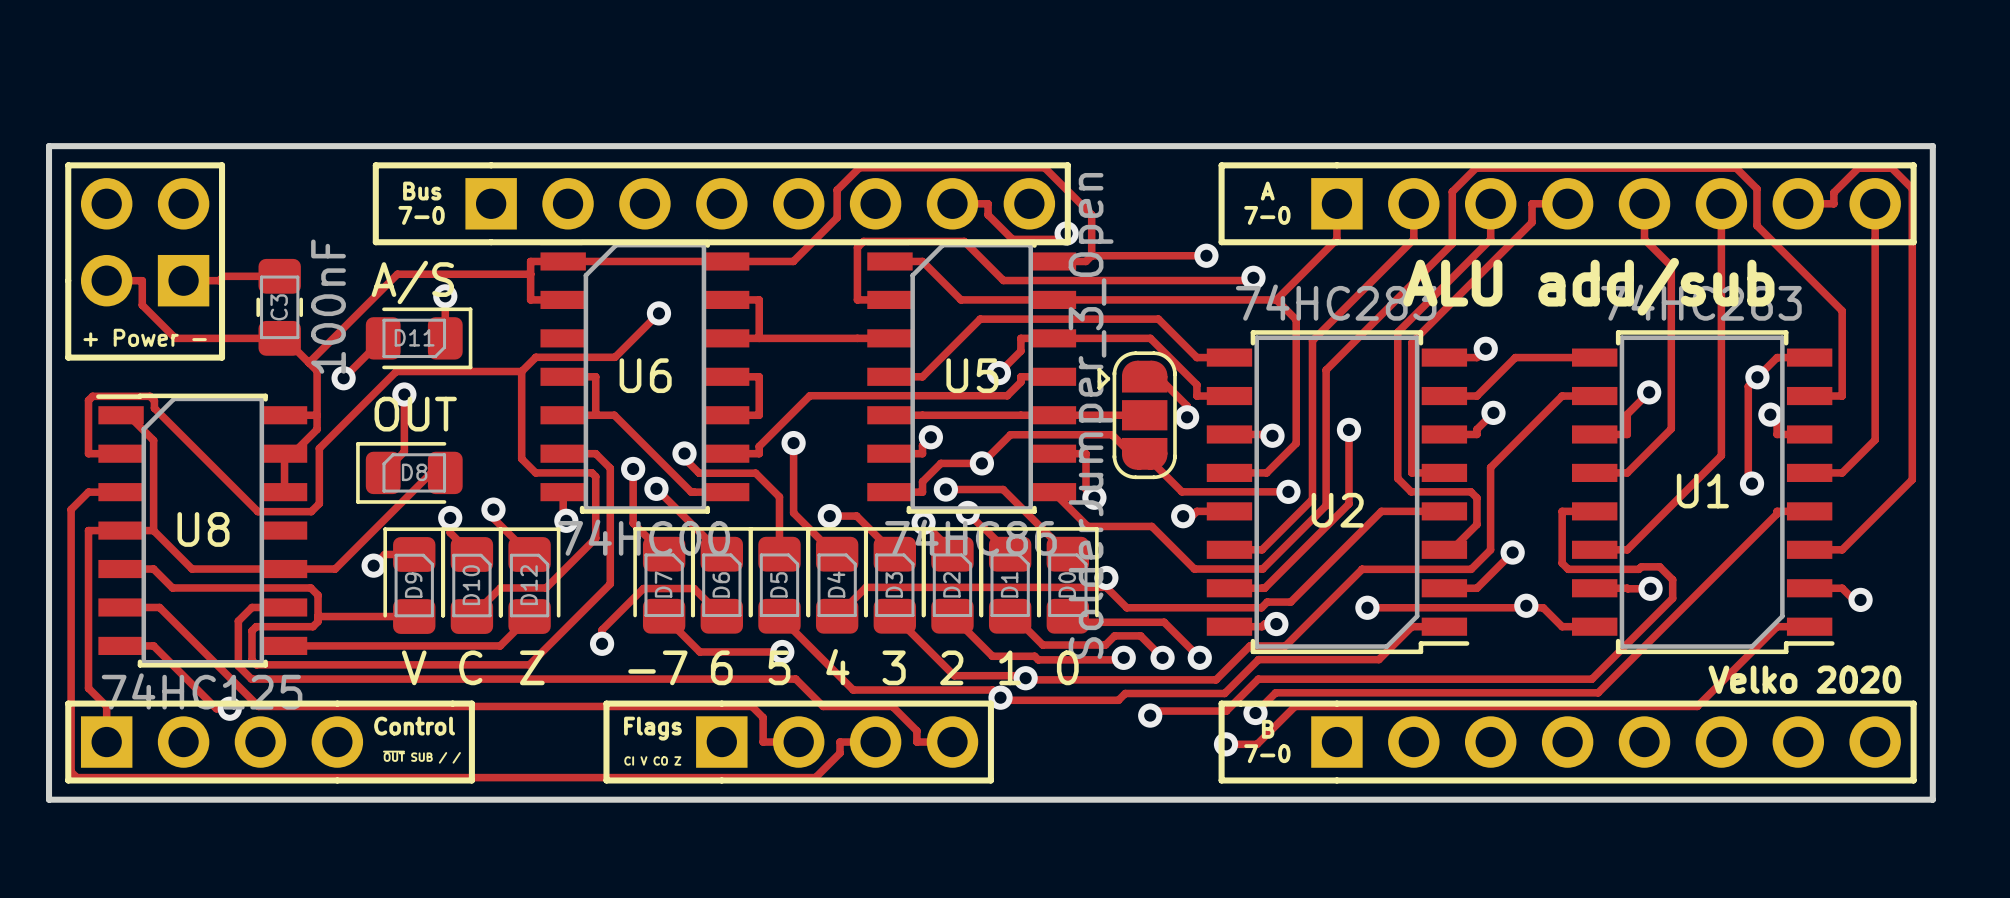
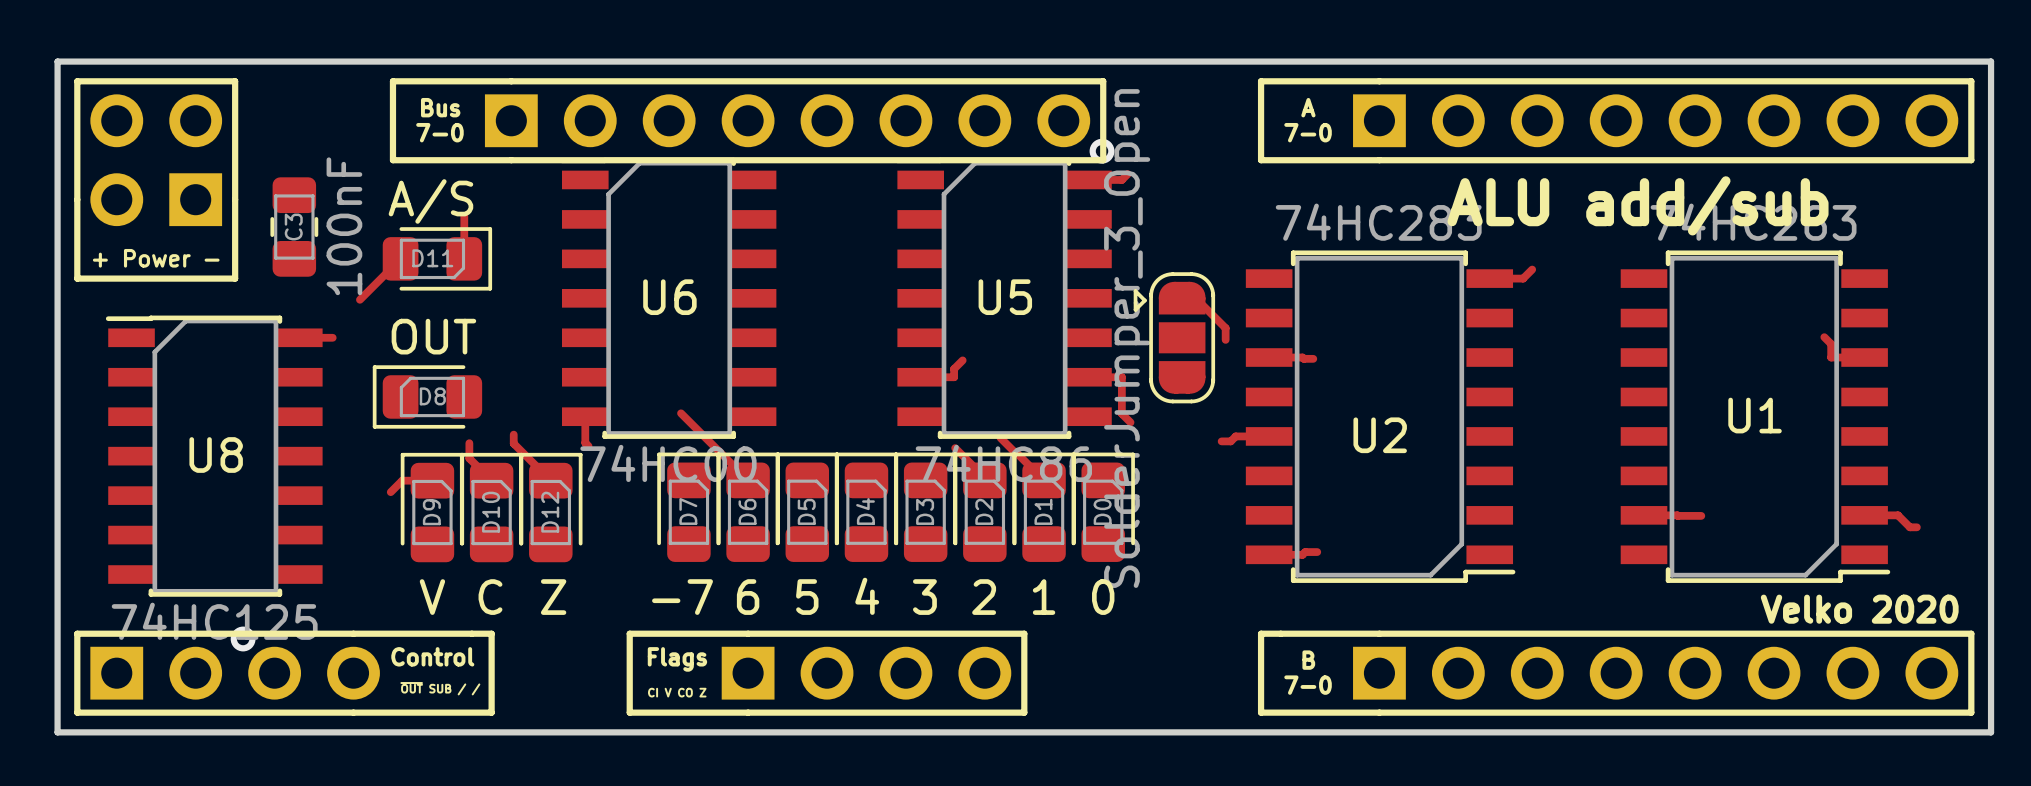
track: (952, 203) (988, 203) (988, 214) (1012, 239) (1060, 239) (1066, 233) -> none
track: (1336, 203) (1336, 239) (1276, 299) -> none
track: (1413, 203) (1413, 239) (1312, 340) (1312, 499) (1262, 549) (1229, 549) -> none
track: (1490, 203) (1490, 239) (1397, 332) (1397, 478) (1411, 491) (1470, 491) (1476, 497) (1476, 524) (1451, 549) (1444, 549) -> none
track: (1567, 203) (1532, 203) (1532, 222) (1411, 342) (1411, 472) (1444, 472) -> none
track: (1644, 203) (1644, 239) (1671, 266) (1671, 428) (1627, 472) (1594, 472) -> none
track: (1721, 203) (1721, 455) (1627, 549) (1594, 549) -> none
track: (1798, 203) (1833, 203) (1833, 192) (1858, 168) (1891, 168) (1912, 188) (1912, 479) (1842, 549) (1809, 549) -> none
track: (1875, 203) (1875, 439) (1842, 472) (1809, 472) -> none
track: (1206, 255) (1091, 255) (1091, 214) (1044, 167) (859, 167) (837, 190) (837, 217) (793, 261) (530, 261) (530, 299) (563, 299) -> none
via: (1206, 255) -> none
track: (889, 261) (922, 261) (960, 299) (1276, 299) -> none
track: (530, 274) (397, 274) (308, 362) -> none
track: (279, 276) (223, 276) (219, 280) (183, 280) -> none
track: (1253, 277) (1250, 280) (1003, 280) (964, 241) (863, 241) (857, 247) (857, 299) (889, 299) -> none
via: (1253, 277) -> none
track: (106, 280) (142, 280) (142, 305) (175, 338) (284, 338) (308, 362) -> none
via: (445, 296) -> none
track: (726, 299) (759, 299) (759, 338) -> none
track: (1276, 299) (1296, 319) (1296, 443) (1266, 472) (1229, 472) -> none
track: (658, 313) (615, 357) (535, 357) (521, 371) -> none
via: (658, 313) -> none
track: (726, 338) (889, 338) -> none
via: (1485, 348) -> none
track: (1229, 357) (1196, 357) (1158, 319) (980, 319) (922, 376) (889, 376) -> none
track: (1594, 357) (1515, 357) (1476, 396) (1444, 396) -> none
track: (1809, 357) (1777, 357) (1748, 386) (1748, 479) (1752, 483) -> none
track: (308, 362) (317, 370) (317, 429) (292, 453) (284, 453) (284, 492) -> none
track: (521, 371) (396, 371) (319, 448) (319, 503) (311, 511) (257, 511) (154, 408) (154, 400) (150, 396) (92, 396) (88, 400) (88, 453) (121, 453) -> none
track: (521, 371) (521, 458) (535, 472) (591, 472) (595, 476) (595, 538) (546, 587) (500, 587) (471, 616) -> none
track: (998, 373) (1020, 351) (1020, 338) (1150, 338) (1196, 384) (1196, 396) (1229, 396) -> none
via: (998, 373) -> none
track: (563, 376) (595, 376) (595, 415) -> none
track: (726, 376) (759, 376) (759, 415) (726, 415) -> none
track: (1053, 376) (1020, 376) (1020, 382) (1007, 395) (809, 395) (759, 446) (759, 453) (726, 453) -> none
via: (1757, 377) -> none
via: (343, 378) -> none
track: (1649, 392) (1627, 414) (1627, 434) (1594, 434) -> none
via: (1649, 392) -> none
track: (404, 394) (404, 451) (383, 472) -> none
via: (404, 394) -> none
track: (1594, 396) (1562, 396) (1490, 467) (1490, 549) (1471, 569) (1362, 569) (1285, 645) (1249, 645) (1216, 679) (1027, 679) (1023, 675) (954, 675) (894, 616) -> none
track: (1809, 396) (1842, 396) (1842, 310) (1756, 225) (1756, 188) (1736, 168) (1475, 168) (1452, 191) (1452, 243) (1326, 370) (1326, 505) (1262, 569) (1194, 569) (1151, 526) (1087, 526) (1053, 492) -> none
track: (1493, 412) (1476, 429) (1476, 434) (1444, 434) -> none
via: (1493, 412) -> none
via: (1770, 414) -> none
track: (121, 415) (128, 415) (153, 440) (153, 530) -> none
track: (563, 415) (614, 415) (691, 492) (726, 492) -> none
track: (889, 415) (1144, 415) -> none
via: (1187, 417) -> none
track: (1348, 429) (1348, 503) (1264, 588) (1229, 588) -> none
via: (1348, 429) -> none
via: (1272, 435) -> none
via: (930, 437) -> none
track: (793, 443) (793, 513) (834, 554) (837, 554) -> none
via: (793, 443) -> none
track: (563, 453) (595, 453) (610, 468) (610, 584) (529, 664) (256, 664) (251, 660) (251, 630) (256, 626) (312, 626) (318, 621) (318, 595) (310, 587) (172, 587) (153, 569) (121, 569) -> none
track: (684, 453) (684, 458) (699, 473) (755, 473) (779, 496) (779, 554) -> none
via: (684, 453) -> none
via: (981, 463) -> none
track: (633, 468) (633, 523) (664, 554) -> none
via: (633, 468) -> none
track: (445, 472) (431, 472) (335, 569) (192, 569) (153, 530) -> none
via: (1752, 483) -> none
via: (656, 488) -> none
track: (945, 489) (1003, 489) (1067, 554) -> none
via: (945, 489) -> none
via: (1288, 491) -> none
track: (121, 492) (88, 492) (71, 509) (71, 771) (76, 777) (815, 777) (840, 753) (840, 742) (875, 742) -> none
track: (889, 492) (922, 492) (922, 481) (940, 463) (981, 463) (1010, 434) (1112, 434) (1132, 454) (1144, 454) (1181, 491) (1288, 491) -> none
via: (1094, 497) -> none
via: (493, 509) -> none
track: (1444, 511) (1381, 511) (1290, 602) (1267, 602) (1261, 607) (1126, 607) (1106, 587) -> none
track: (1594, 511) (1562, 511) (1562, 563) (1568, 569) (1638, 569) (1641, 566) (1659, 566) (1672, 579) (1672, 598) (1591, 679) (1258, 679) (1226, 711) (1154, 711) (1150, 715) -> none
track: (1809, 511) (1777, 511) (1777, 513) (1598, 692) (1275, 692) (1255, 713) -> none
via: (967, 512) -> none
track: (829, 516) (856, 516) (894, 554) -> none
via: (829, 516) -> none
via: (1183, 516) -> none
via: (450, 517) -> none
via: (566, 520) -> none
via: (923, 522) -> none
track: (153, 530) (88, 530) (88, 688) (106, 706) (106, 742) -> none
track: (1512, 552) (1476, 588) (1444, 588) -> none
via: (1512, 552) -> none
via: (373, 565) -> none
via: (1106, 577) -> none
track: (1106, 587) (866, 587) (837, 616) -> none
via: (1650, 588) -> none
via: (1860, 599) -> none
via: (1526, 605) -> none
track: (121, 607) (159, 607) (258, 706) (752, 706) (763, 717) (763, 742) (798, 742) -> none
track: (284, 607) (251, 607) (238, 621) (238, 665) (251, 679) (795, 679) (823, 706) (892, 706) (916, 730) (916, 742) (952, 742) -> none
track: (1367, 607) (1543, 607) (1562, 626) (1594, 626) -> none
via: (1367, 607) -> none
track: (318, 616) (414, 616) -> none
track: (529, 616) (500, 645) (284, 645) -> none
track: (664, 616) (699, 651) (782, 651) -> none
track: (721, 616) (694, 588) (643, 588) (602, 629) (602, 643) -> none
track: (779, 616) (853, 690) (992, 690) (1003, 700) (1118, 700) (1125, 693) (1224, 693) (1258, 659) (1378, 659) (1411, 626) (1444, 626) -> none
track: (952, 616) (992, 656) (1034, 656) (1038, 659) (1121, 659) (1123, 657) -> none
track: (1010, 616) (1014, 616) (1042, 645) (1105, 645) (1114, 635) (1140, 635) (1162, 657) -> none
track: (1067, 616) (1073, 622) (1164, 622) (1199, 657) -> none
via: (1276, 624) -> none
track: (1809, 626) (1777, 626) (1697, 706) (1294, 706) (1257, 744) (1226, 744) -> none
via: (602, 643) -> none
track: (121, 645) (153, 645) (216, 708) (229, 708) -> none
via: (782, 651) -> none
via: (1123, 657) -> none
via: (1162, 657) -> none
via: (1199, 657) -> none
via: (1025, 678) -> none
via: (1000, 697) -> none
via: (1255, 713) -> none
via: (1150, 715) -> none
via: (1226, 744) -> none

